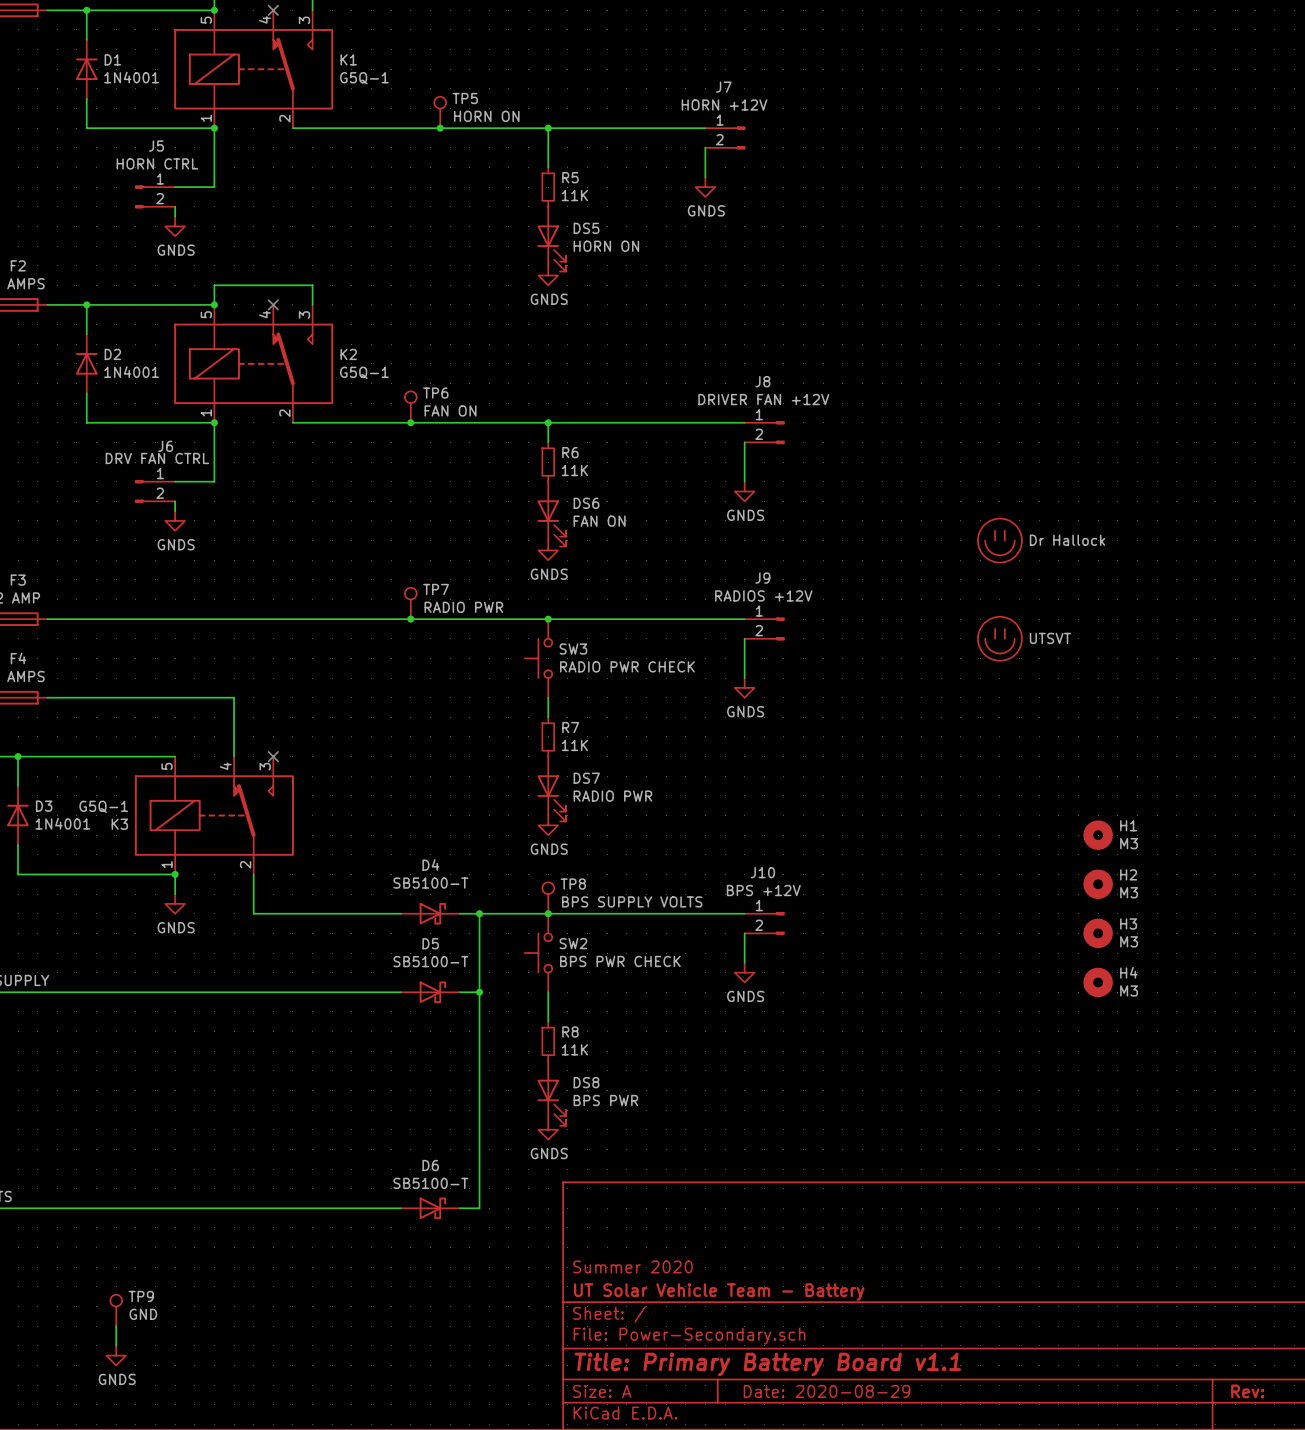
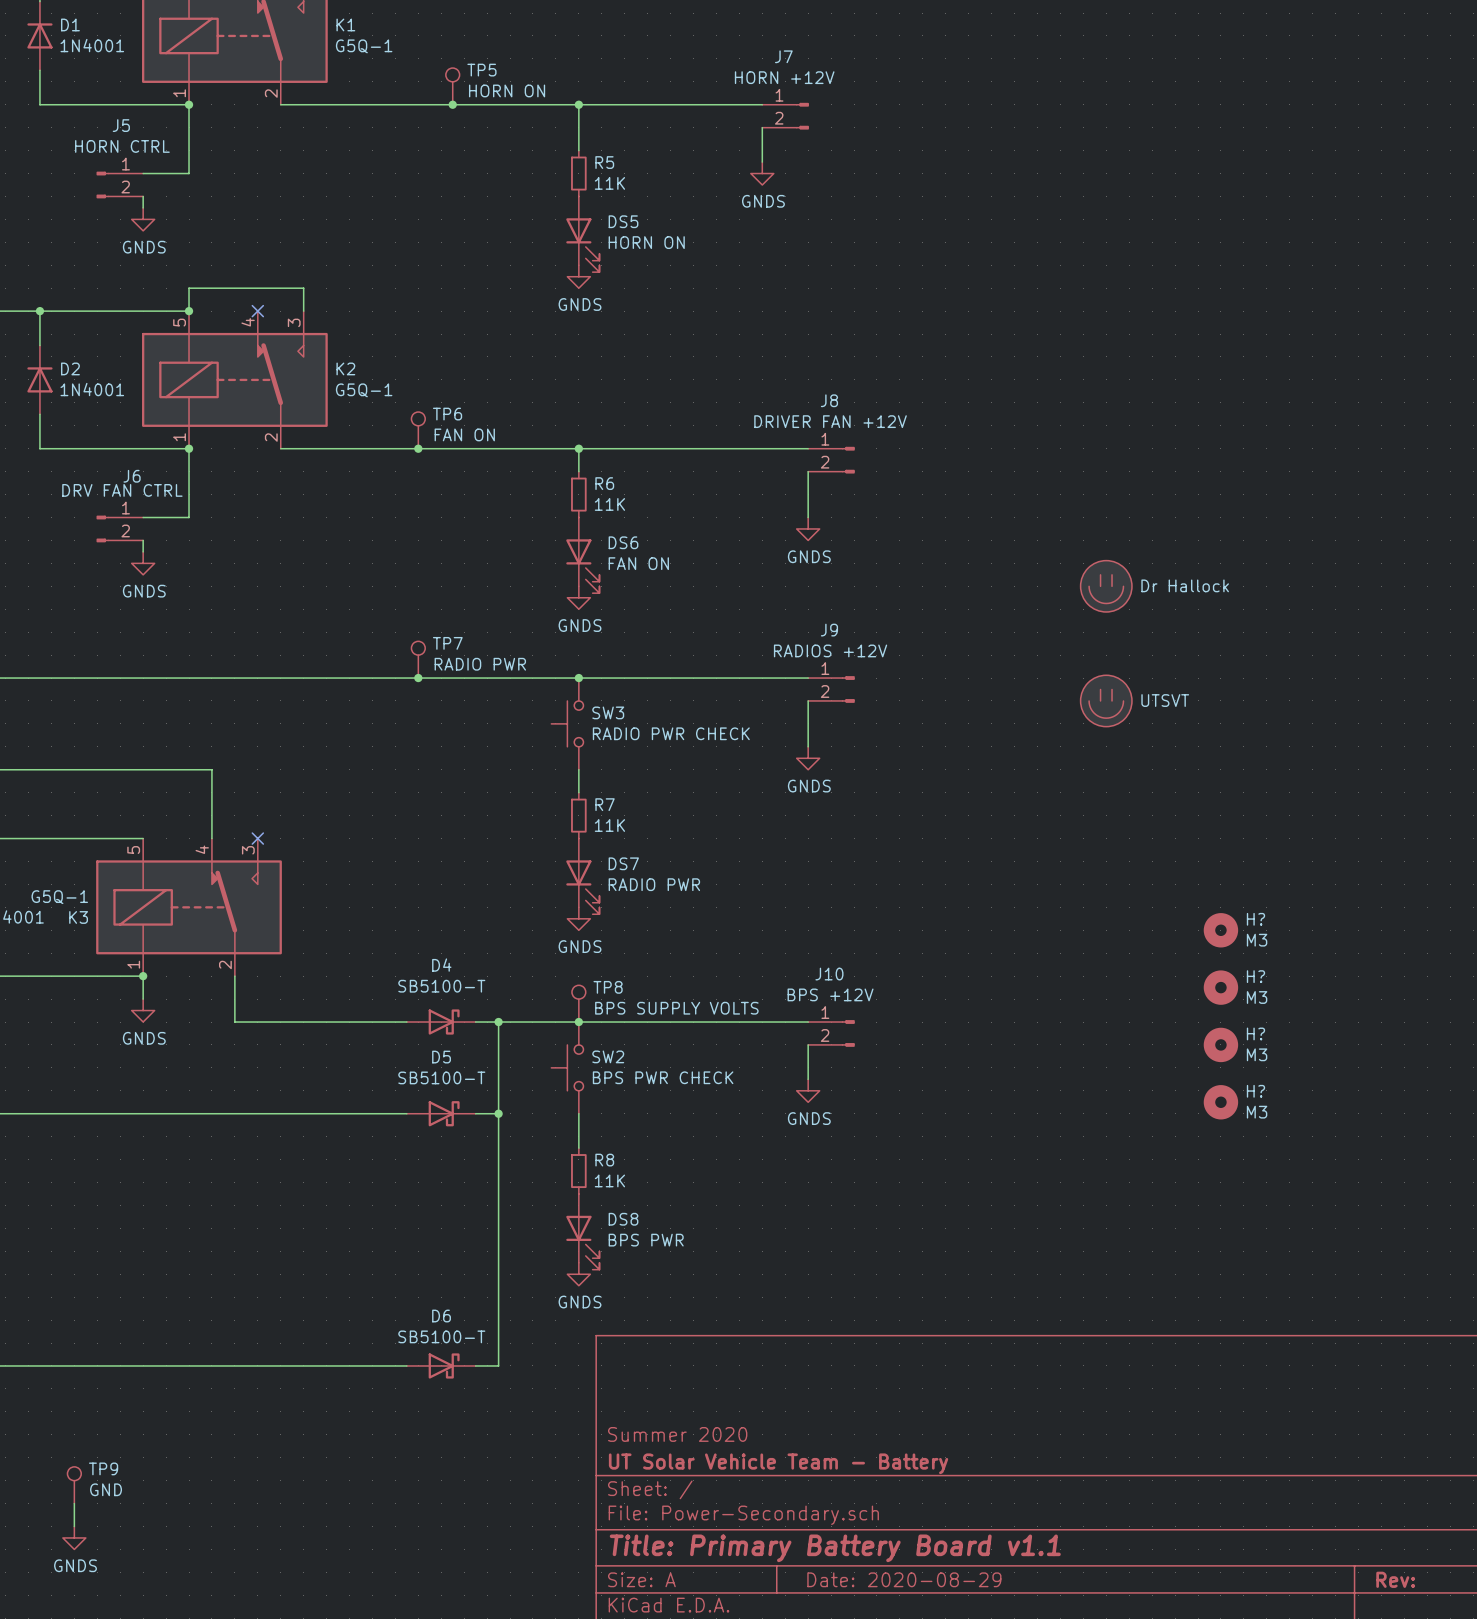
H1 name: H1 (1128, 825) -> H? (1255, 919)
H2 name: H2 (1128, 874) -> H? (1255, 976)
H3 name: H3 (1128, 923) -> H? (1255, 1033)
H4 name: H4 (1128, 972) -> H? (1255, 1091)

